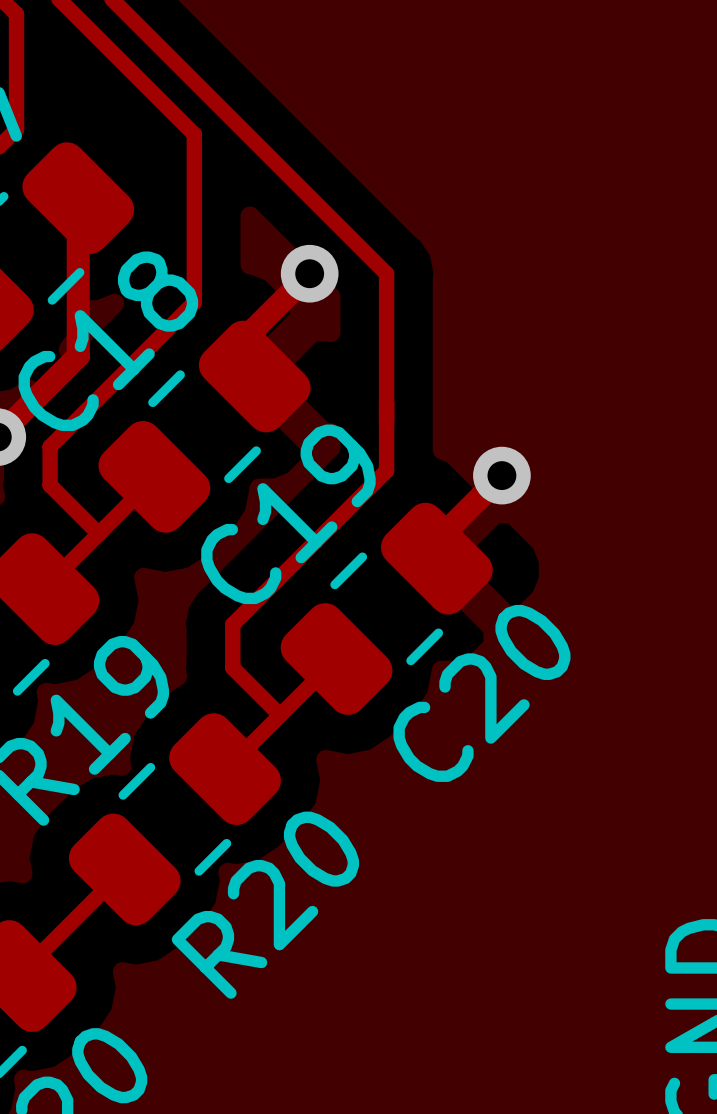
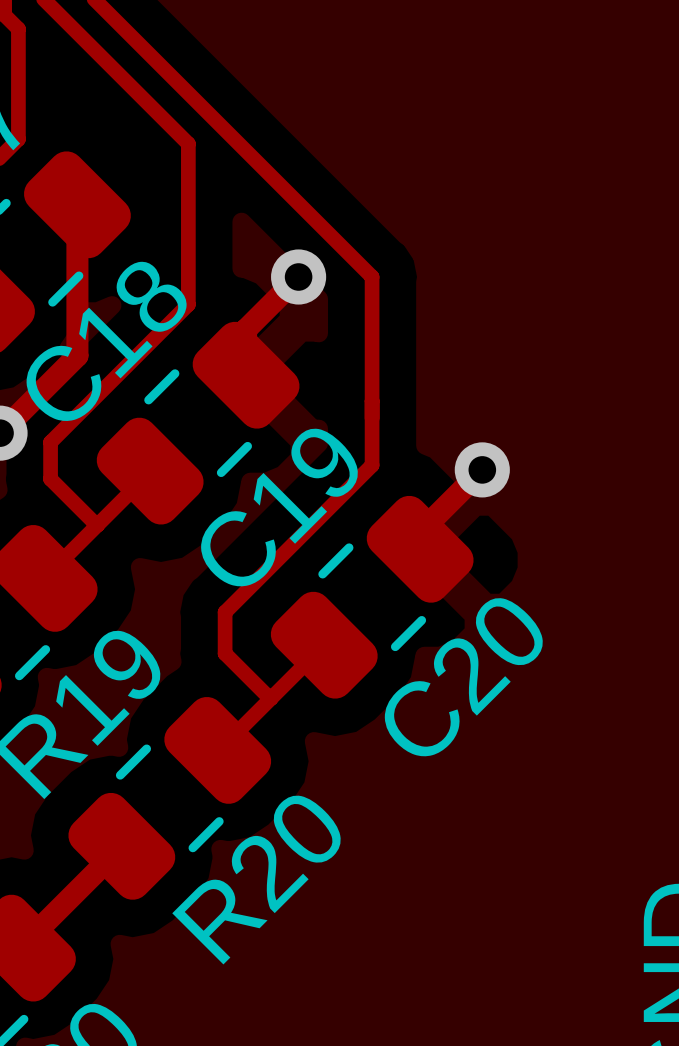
track width: thin (124, 869) (20, 973) (20, 976) -> thick (121, 846) (22, 945) (22, 948)

